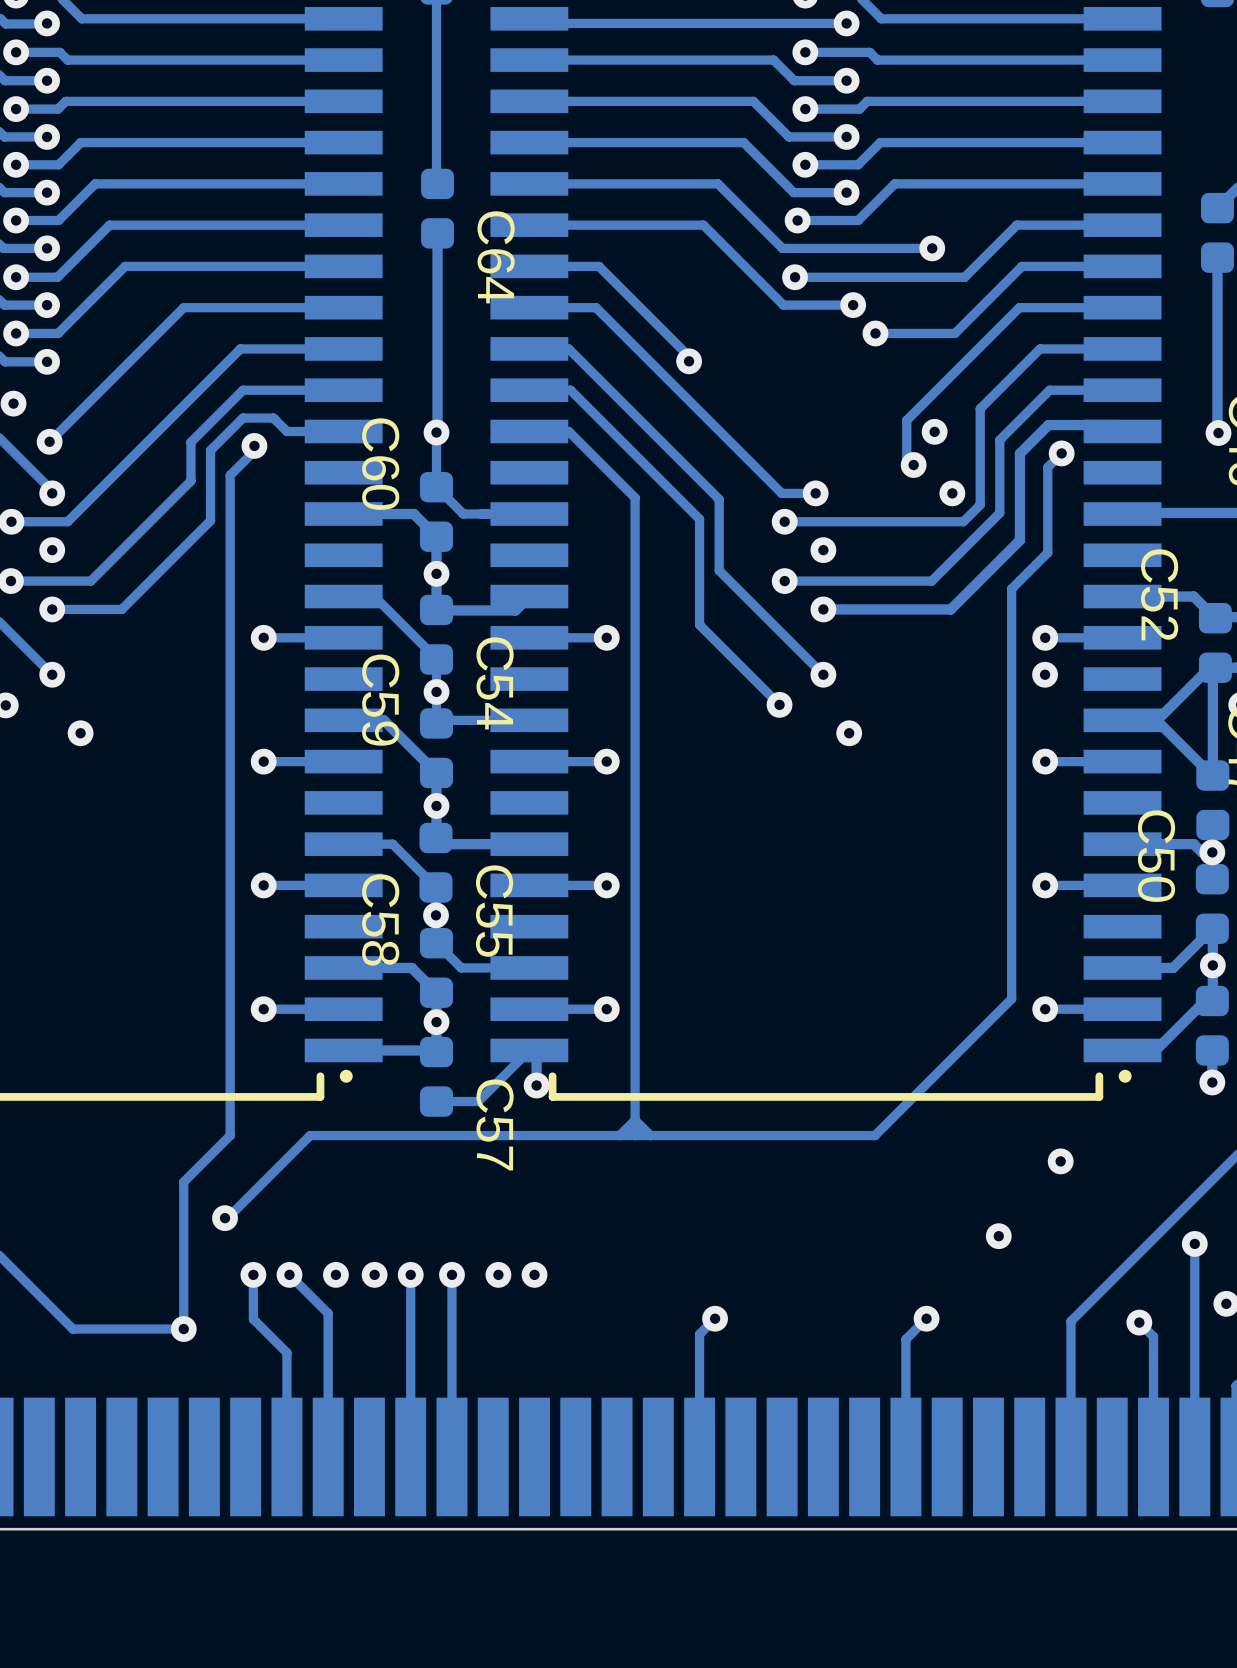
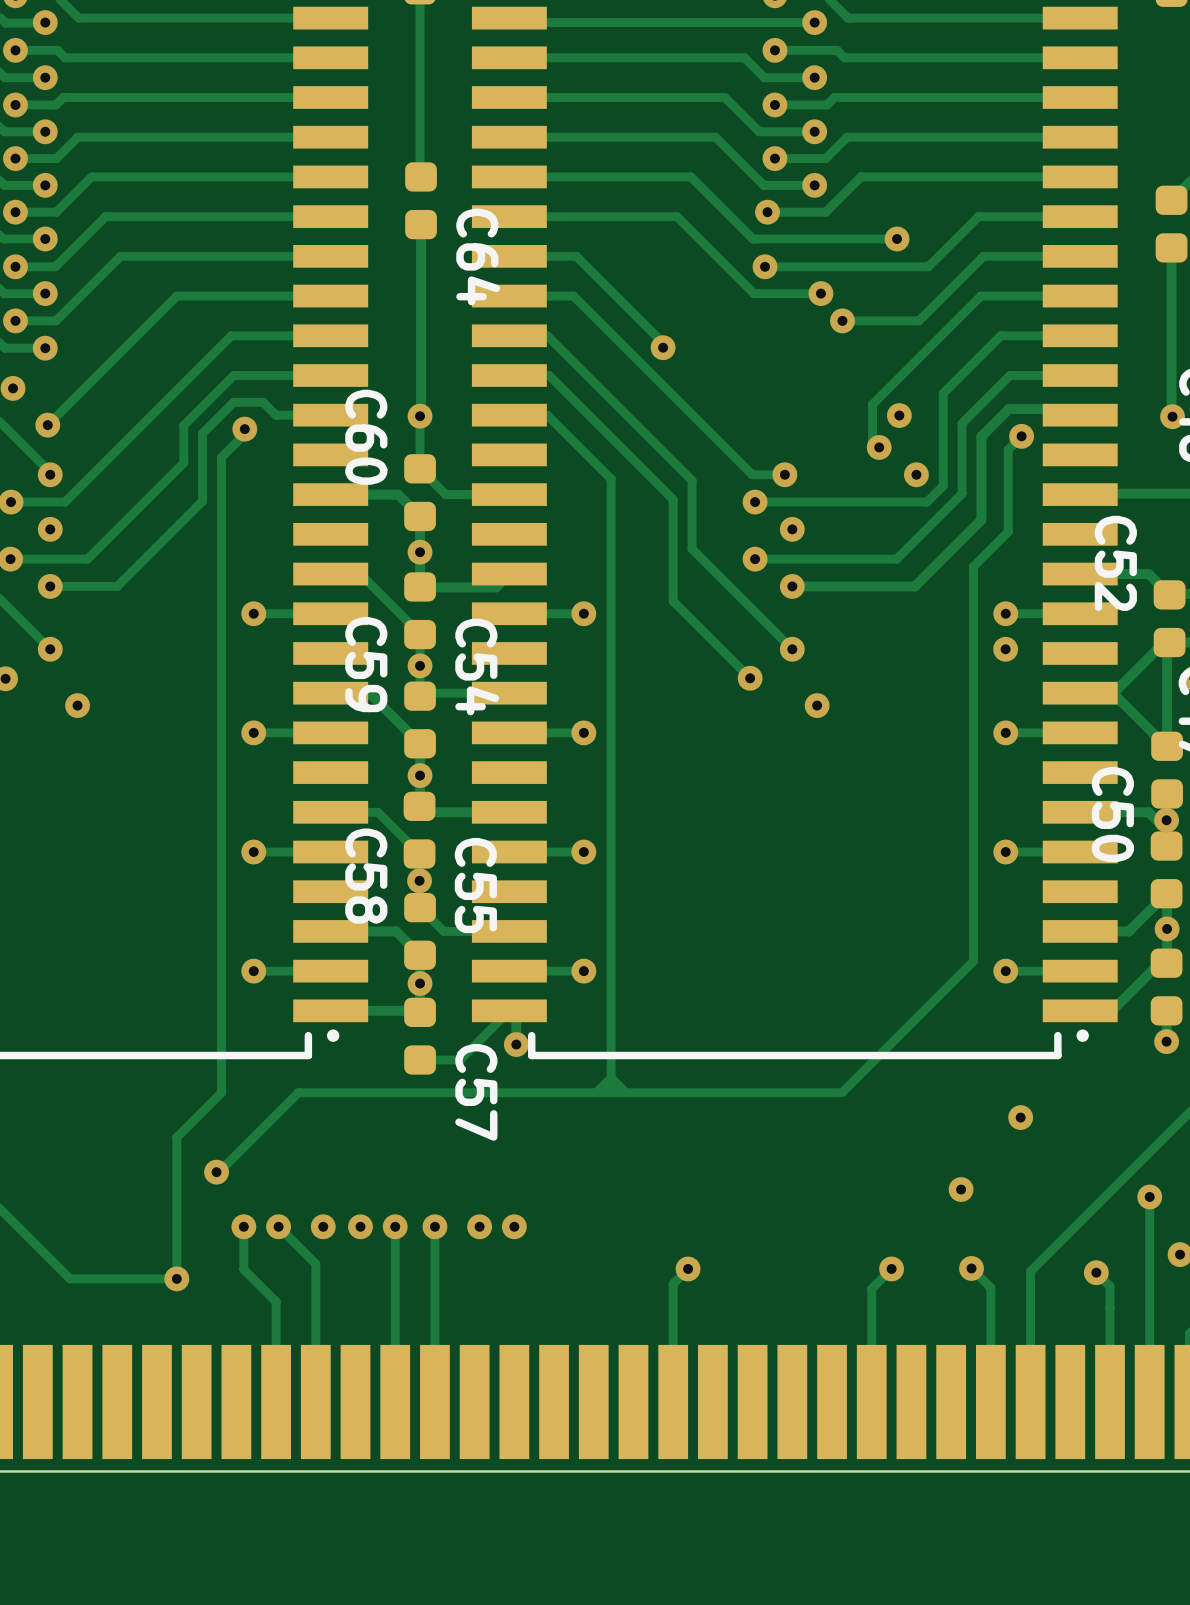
track: none -> (971, 1268) (990, 1287) (990, 1401)
via: none -> (971, 1268)

